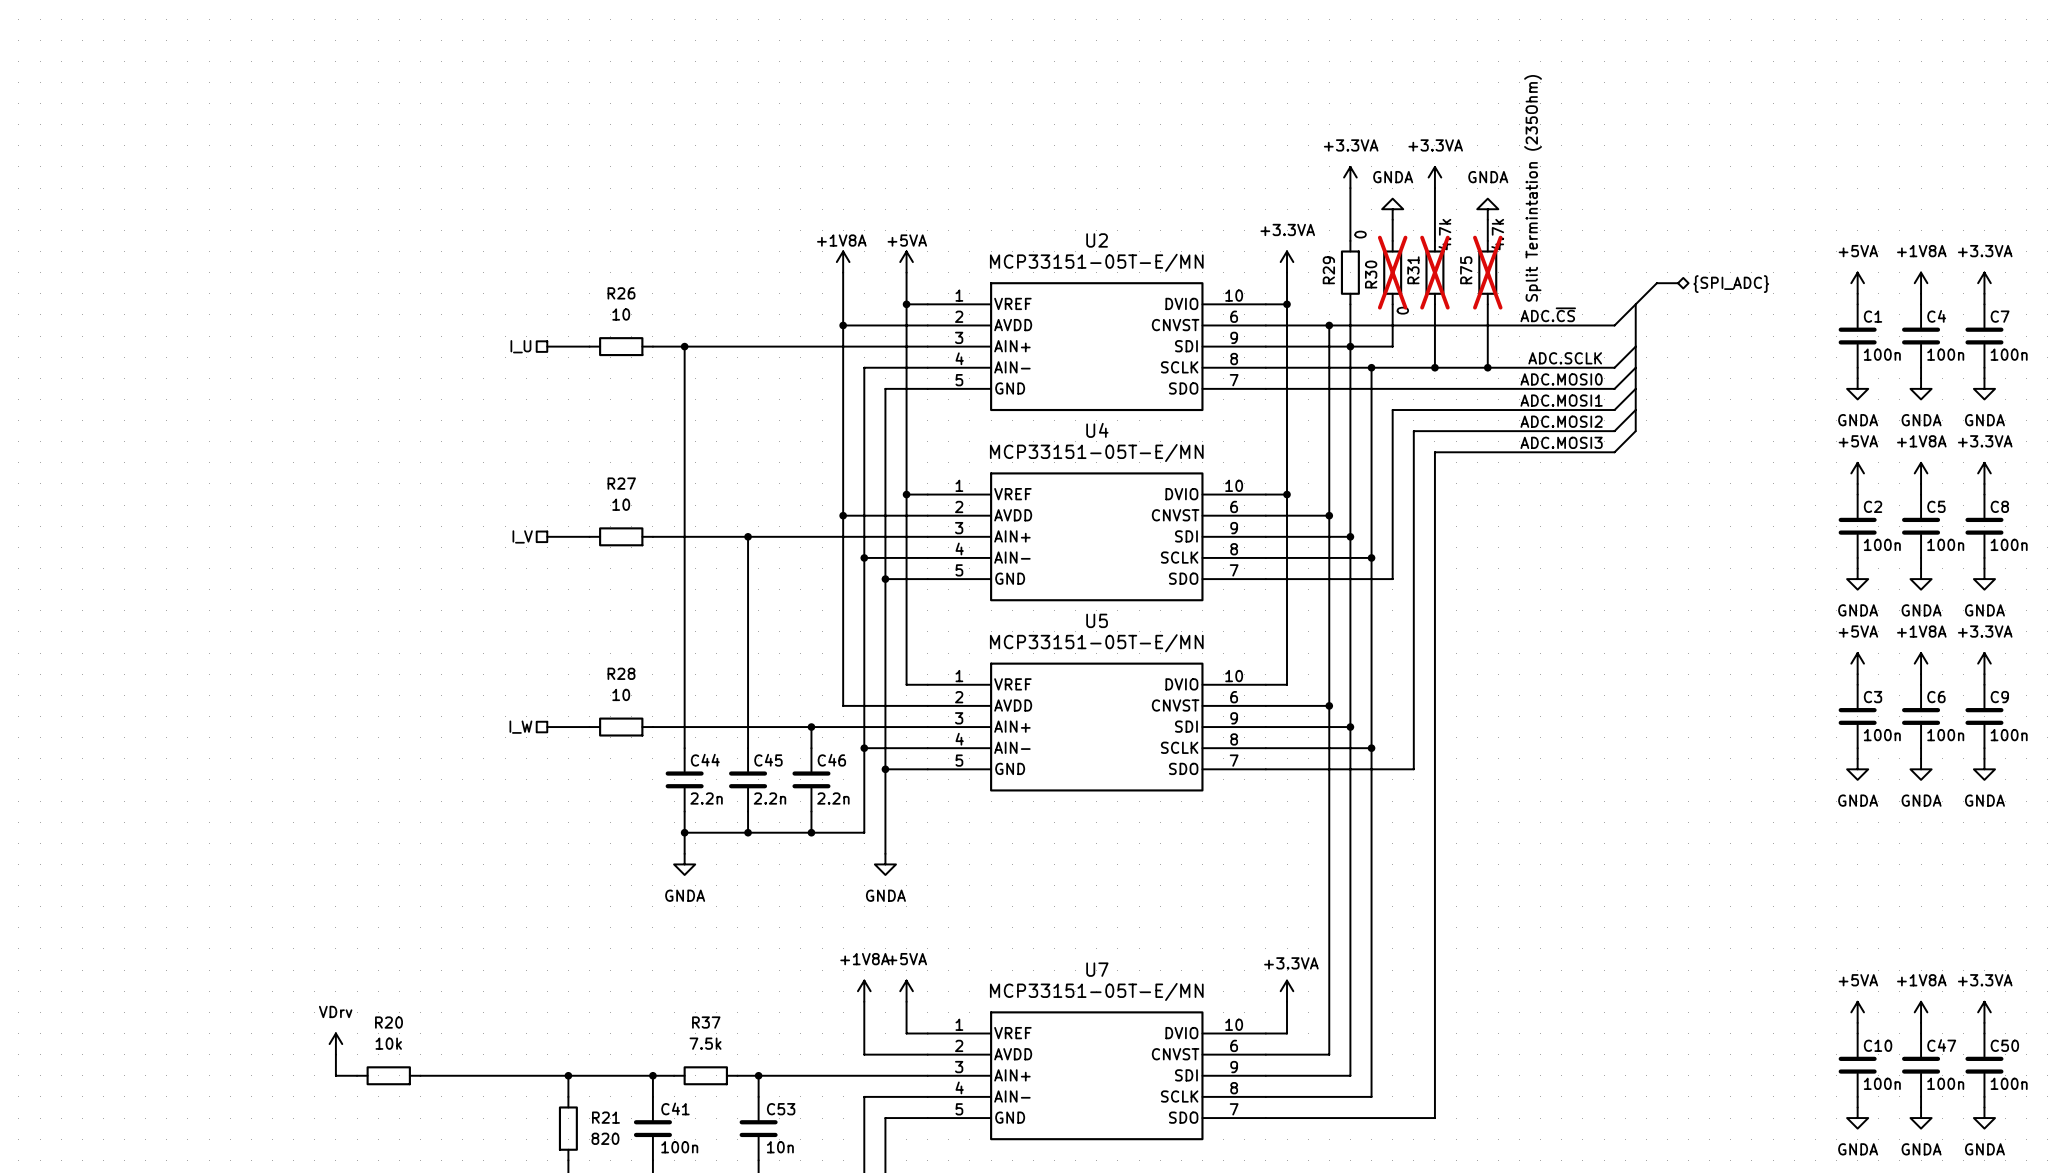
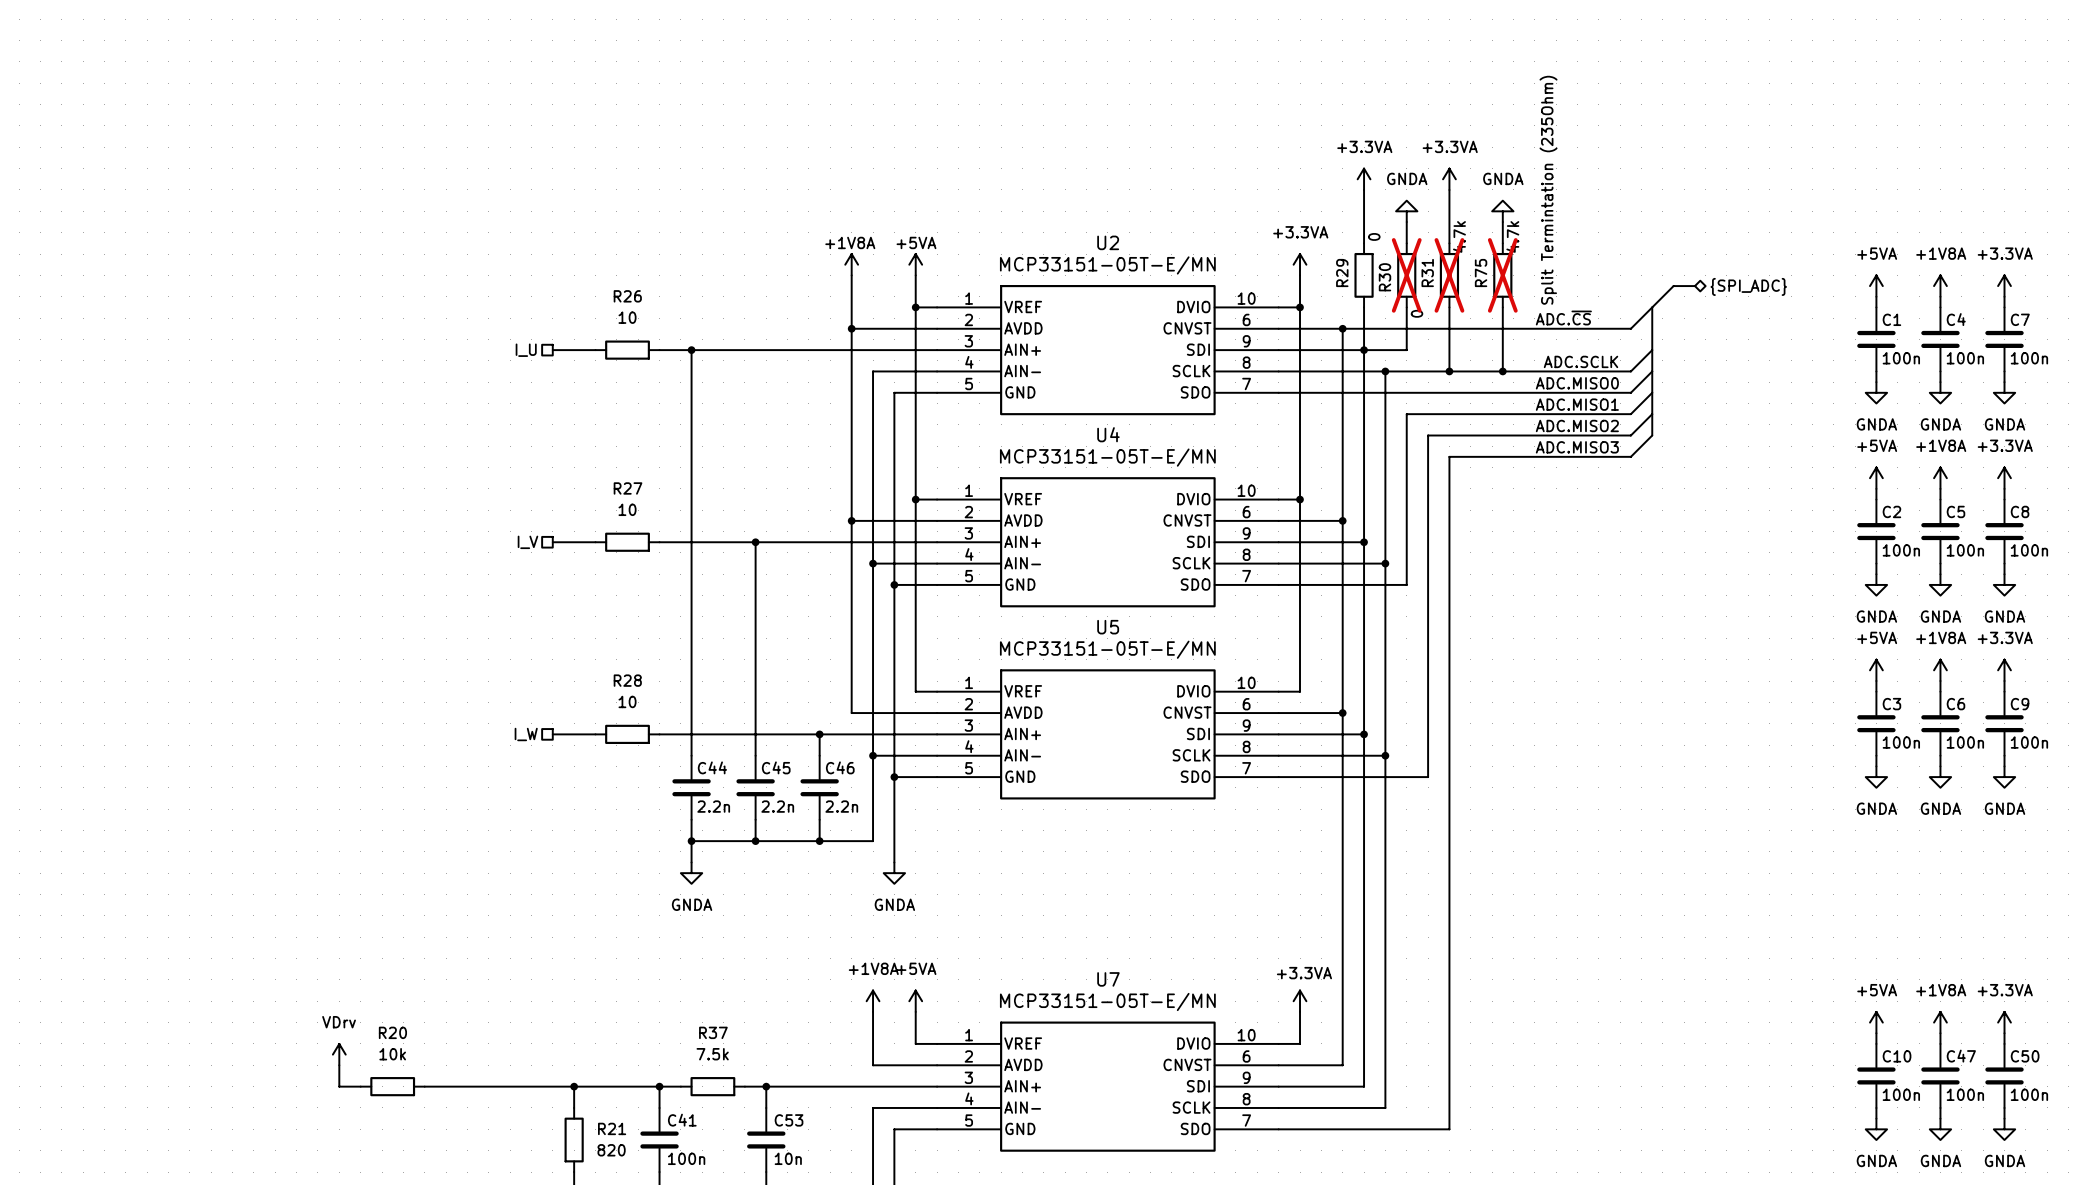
label: ADC.MOSI0 (1561, 379) -> ADC.MISO0 (1577, 383)
label: ADC.MOSI1 (1561, 400) -> ADC.MISO1 (1577, 404)
label: ADC.MOSI2 (1561, 421) -> ADC.MISO2 (1577, 425)
label: ADC.MOSI3 (1561, 442) -> ADC.MISO3 (1577, 447)

